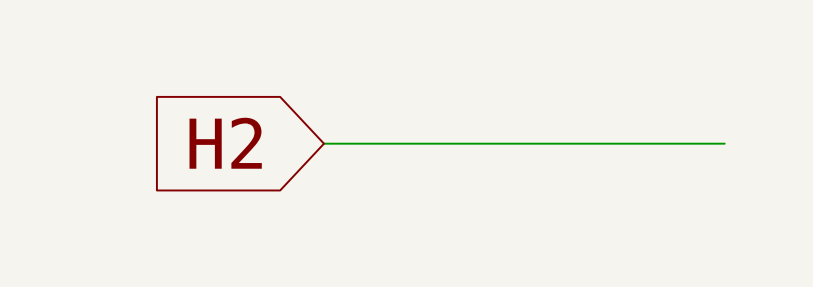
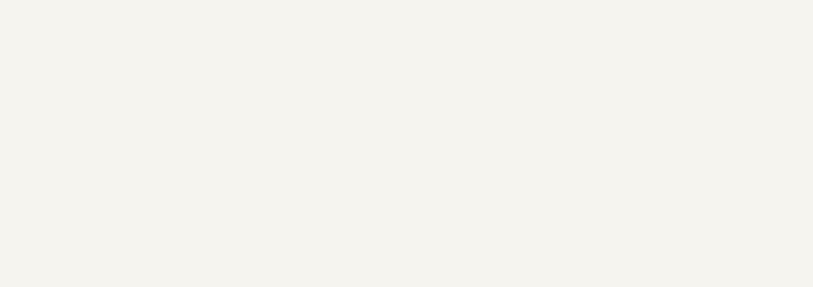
global label: H2 (225, 143) -> none
wire: (323, 143) (724, 143) -> none

